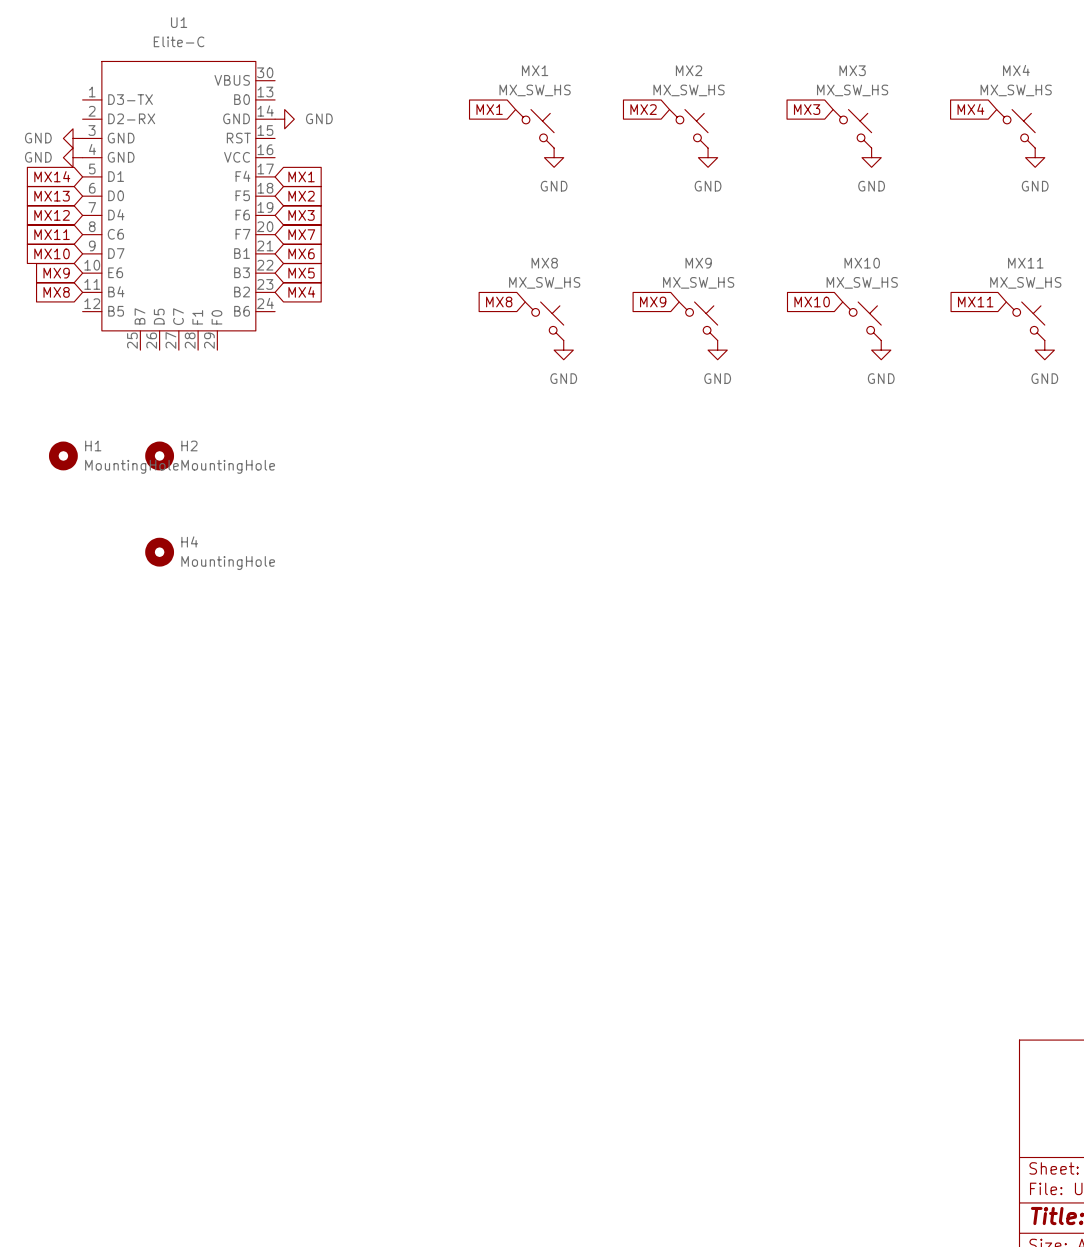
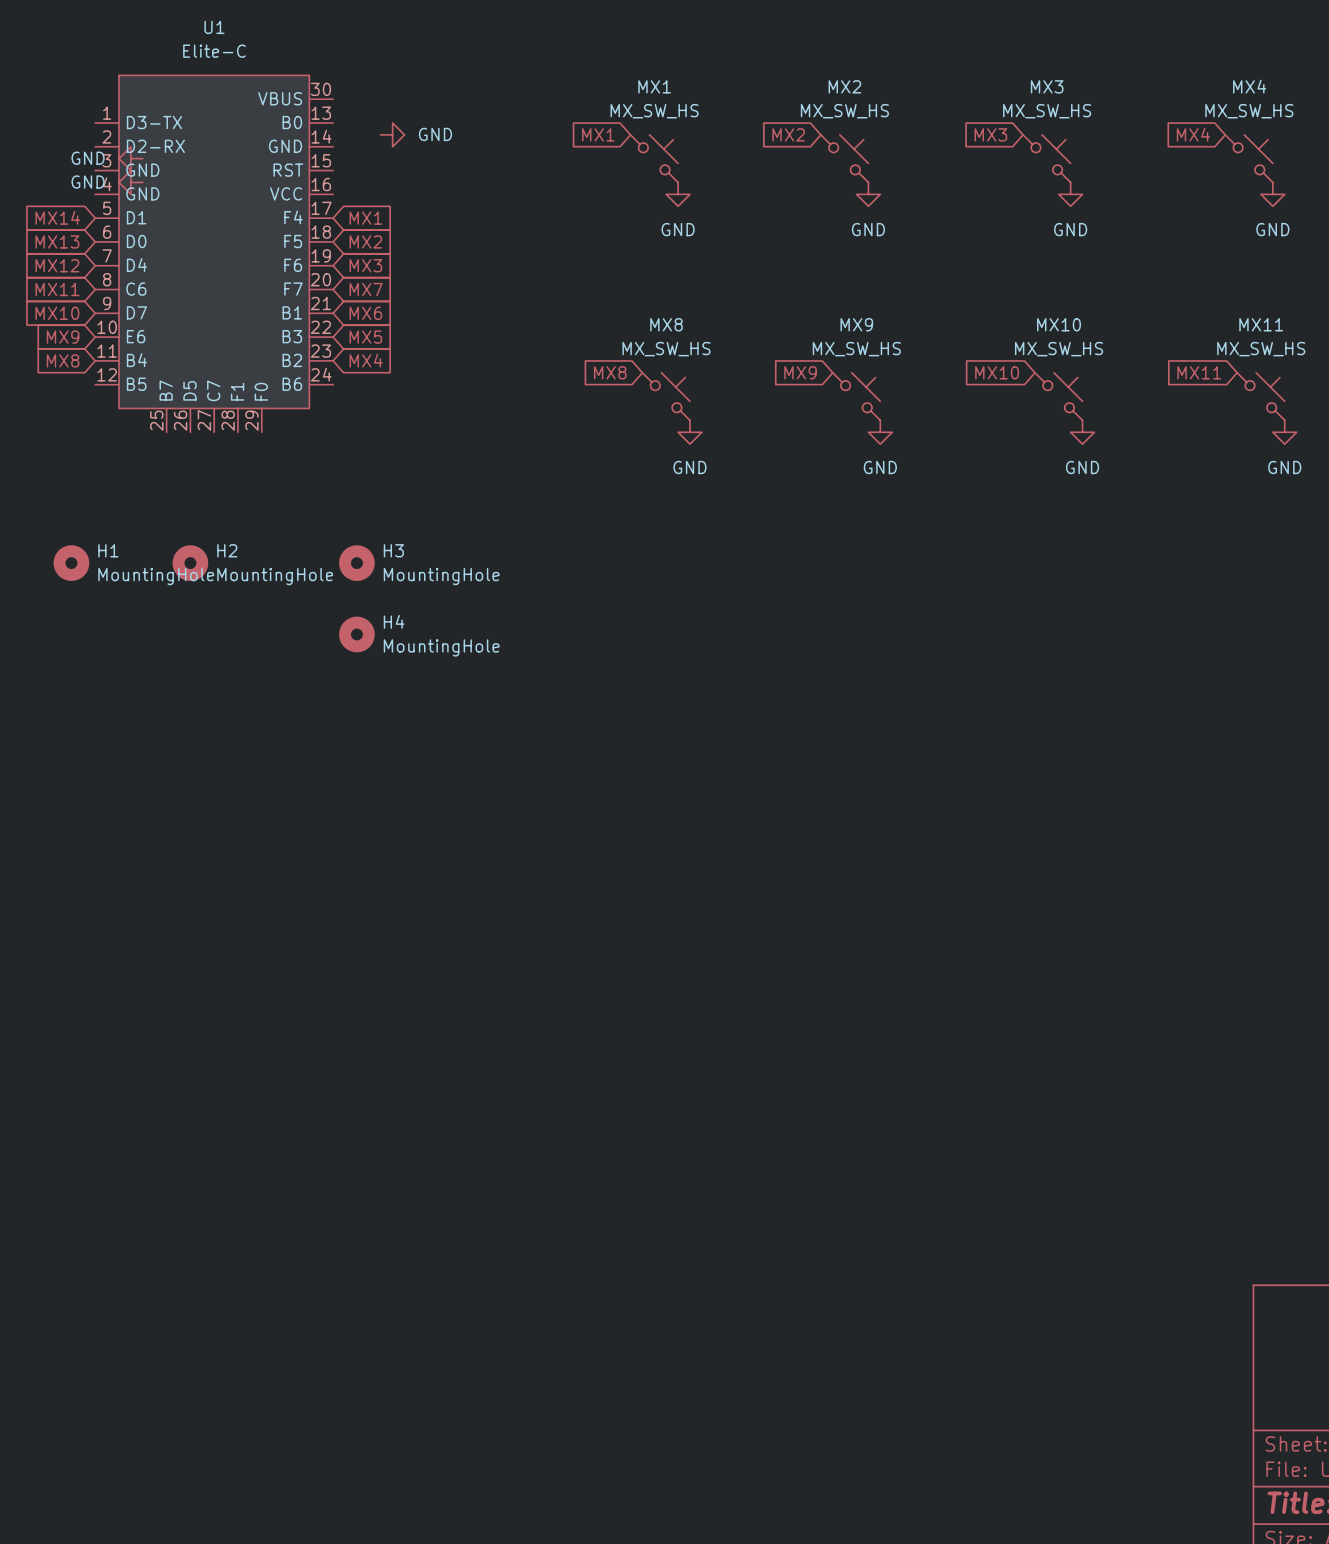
power symbol position: GND (284, 119) -> GND (392, 134)
power symbol: none -> GND (130, 158)
power symbol: GND (73, 138) -> none
power symbol: none -> GND (130, 182)
power symbol: GND (73, 157) -> none
H3: none -> MountingHole (356, 563)
H4 position: (159, 552) -> (356, 634)

